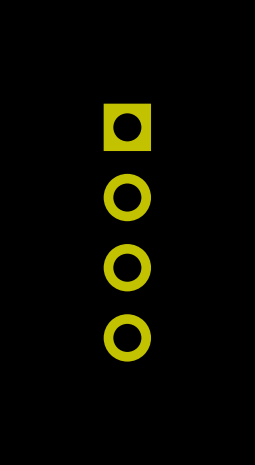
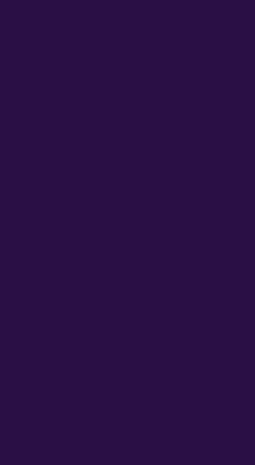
part: (127, 232) -> none

